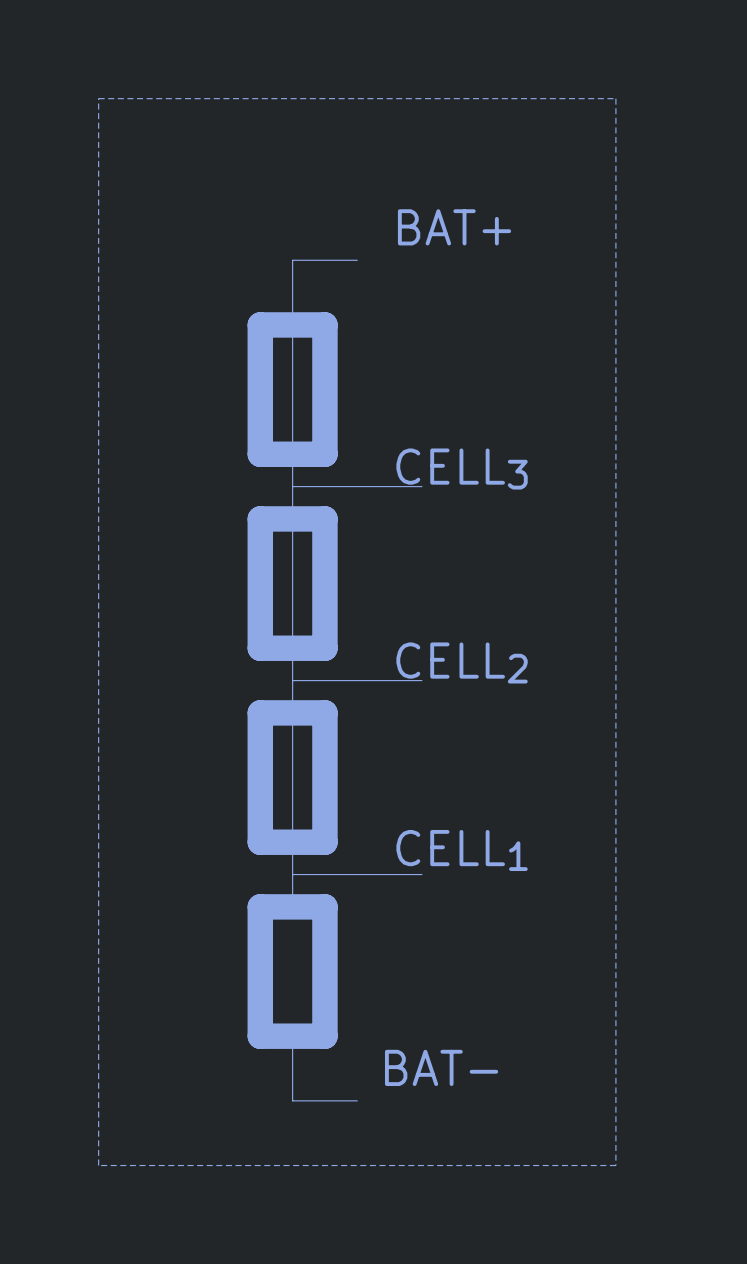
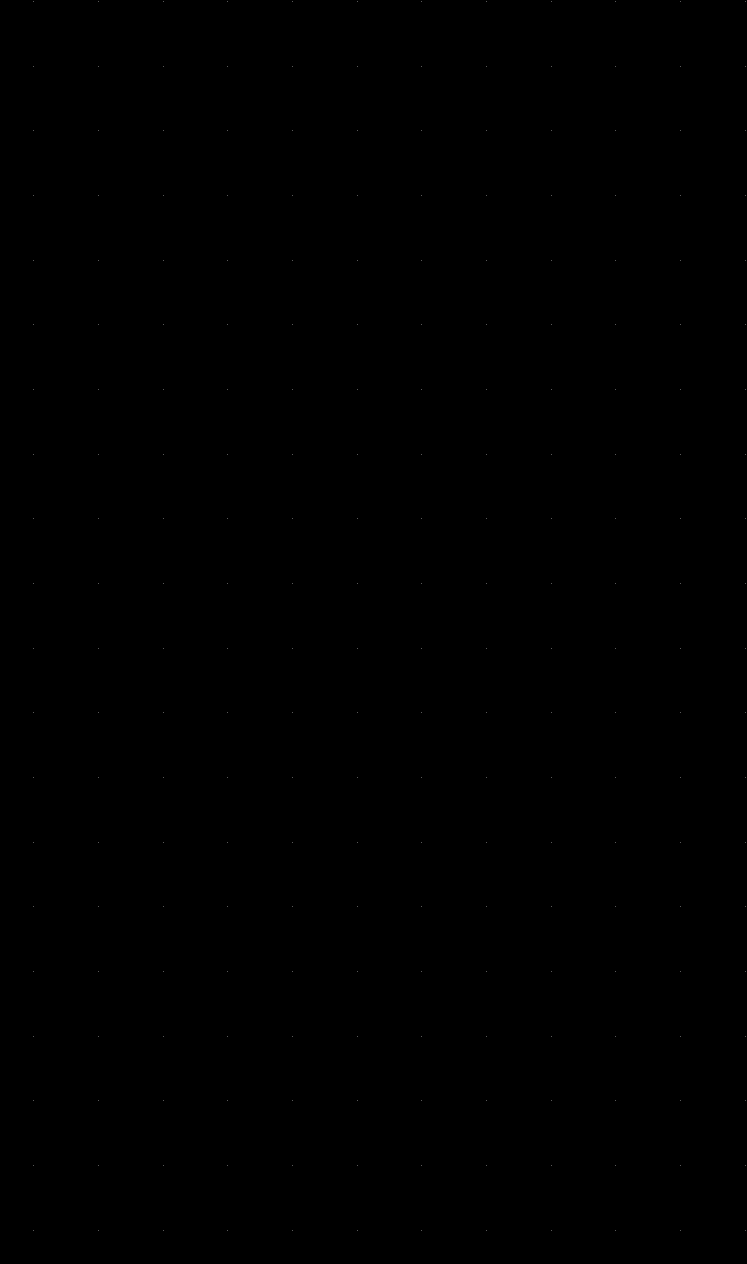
line: (98, 98) (615, 98) (615, 1165) (98, 1165) (98, 98) -> none
text: BAT+ (454, 227) -> none
line: (357, 260) (292, 260) (292, 906) -> none
line: (260, 324) (324, 324) (324, 454) (260, 454) (260, 324) -> none
text: CELL3 (462, 469) -> none
line: (292, 486) (421, 486) -> none
line: (260, 518) (260, 648) (324, 648) (324, 518) (260, 518) -> none
text: CELL2 (462, 662) -> none
line: (292, 680) (421, 680) -> none
line: (260, 712) (260, 842) (324, 842) (324, 712) (260, 712) -> none
text: CELL1 (462, 850) -> none
line: (292, 874) (421, 874) -> none
line: (260, 906) (260, 1036) (324, 1036) (324, 906) (260, 906) -> none
line: (292, 1036) (292, 1100) (357, 1100) -> none
text: BAT- (441, 1067) -> none

